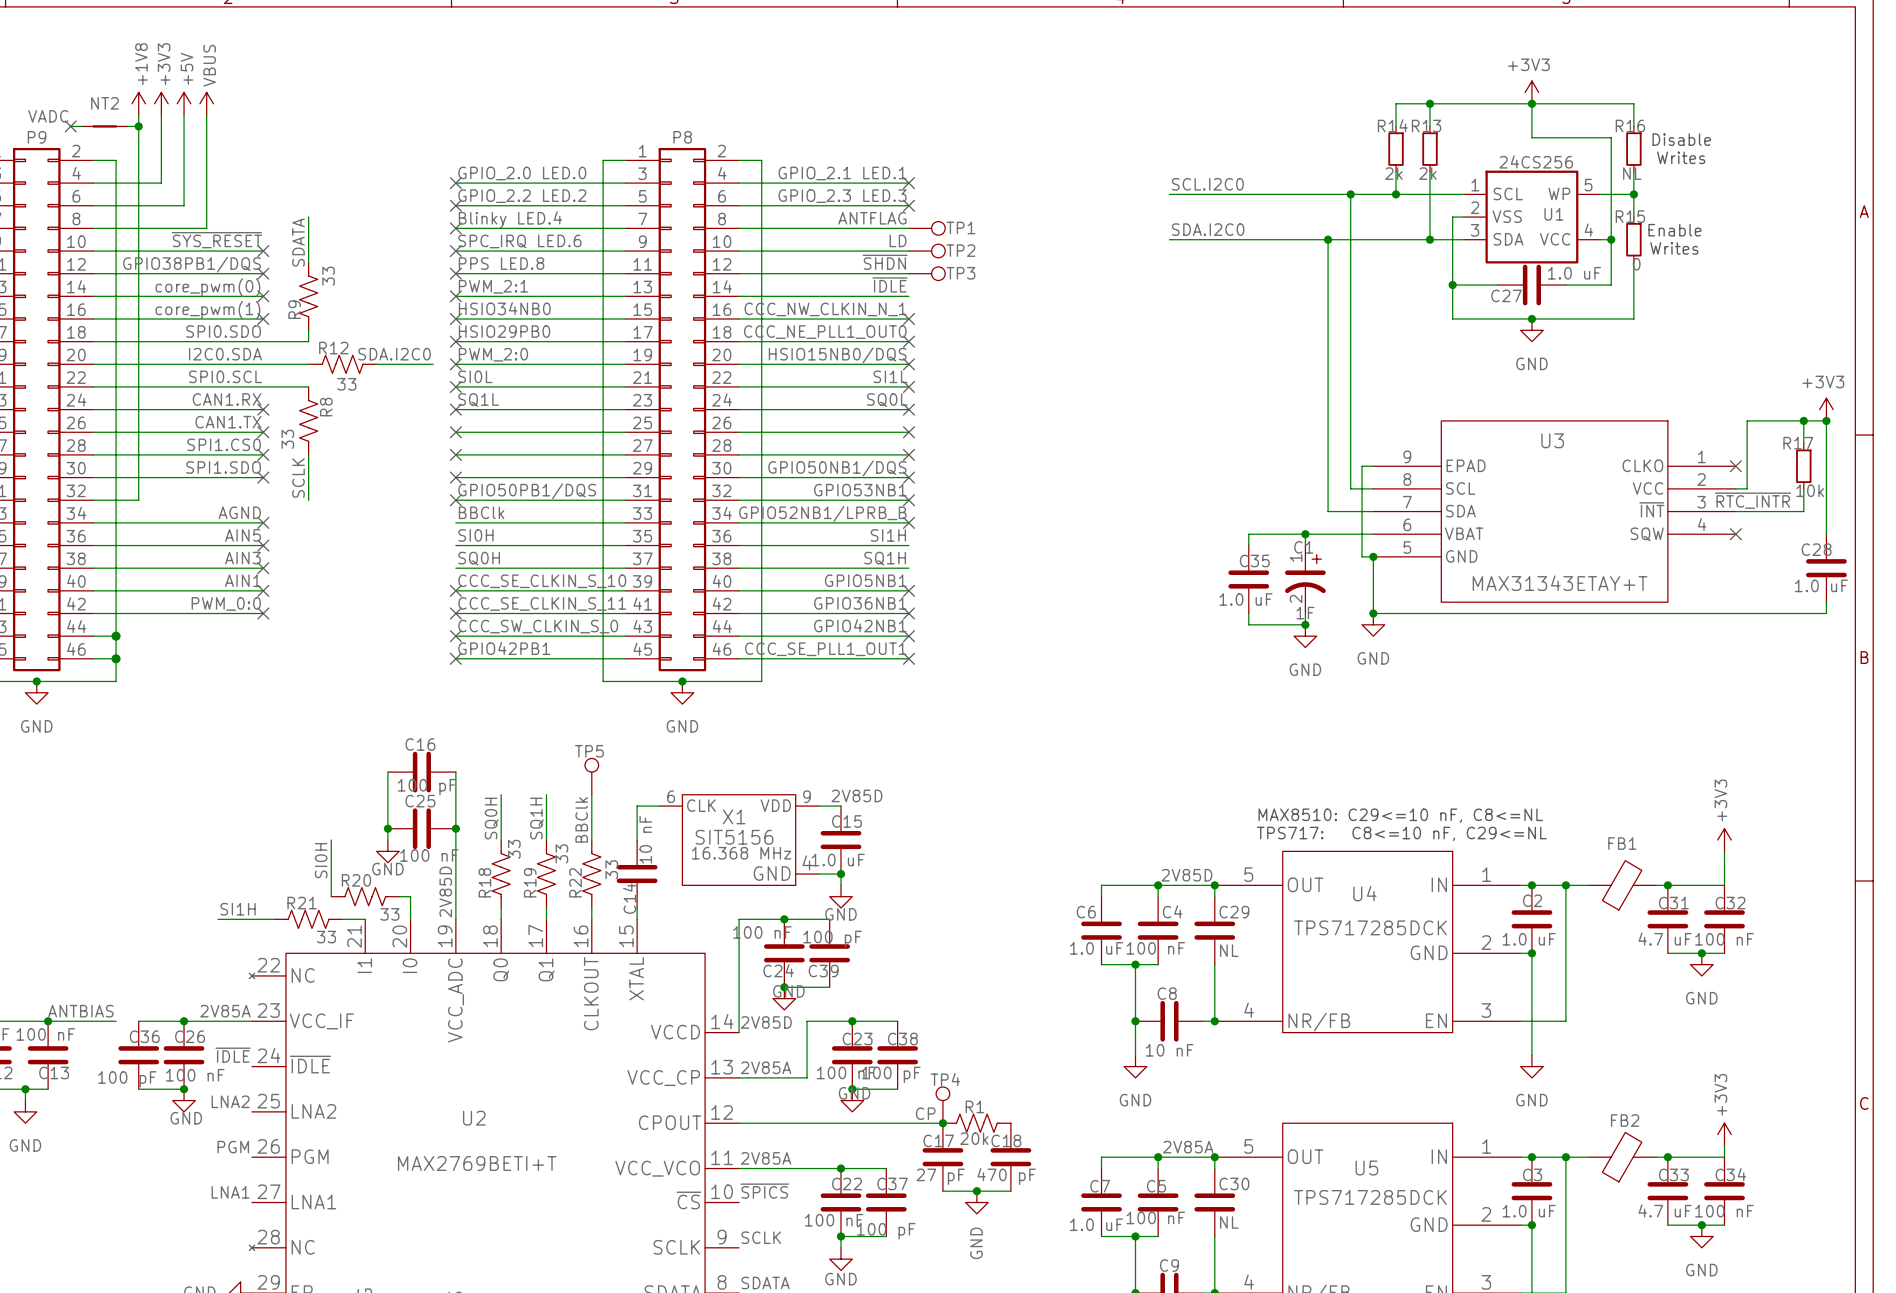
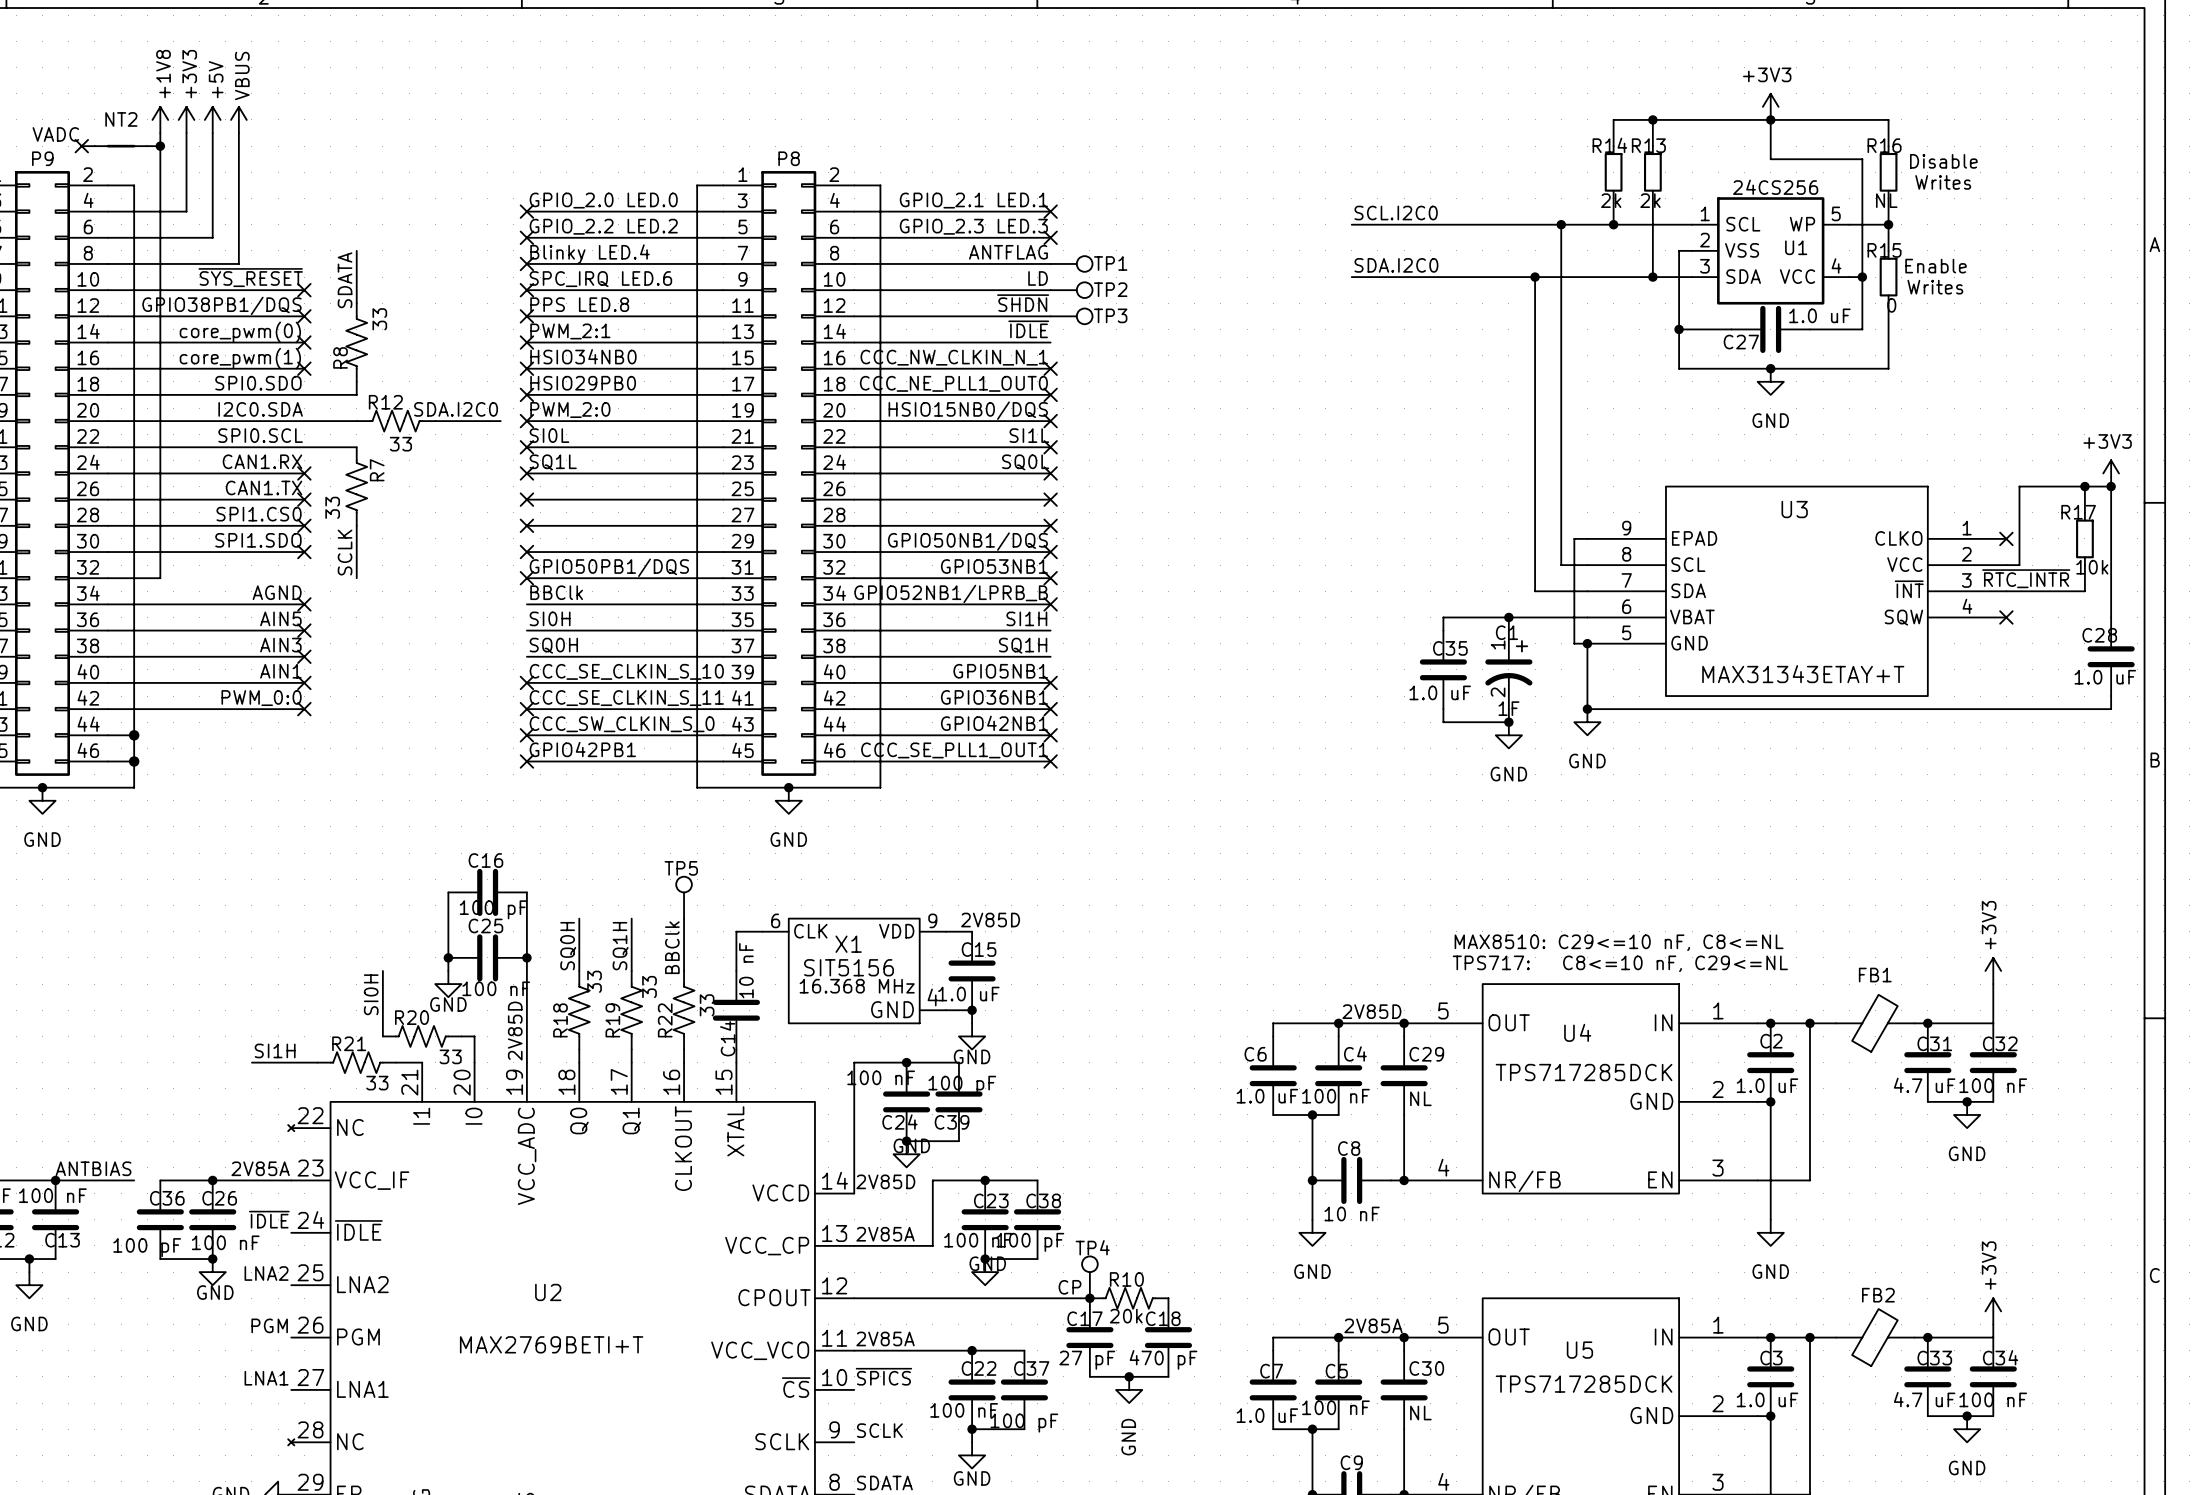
R9 name: R9 (294, 309) -> R8 (340, 357)
R8 name: R8 (326, 407) -> R7 (377, 470)
R1 name: R1 (974, 1106) -> R10 (1126, 1279)

